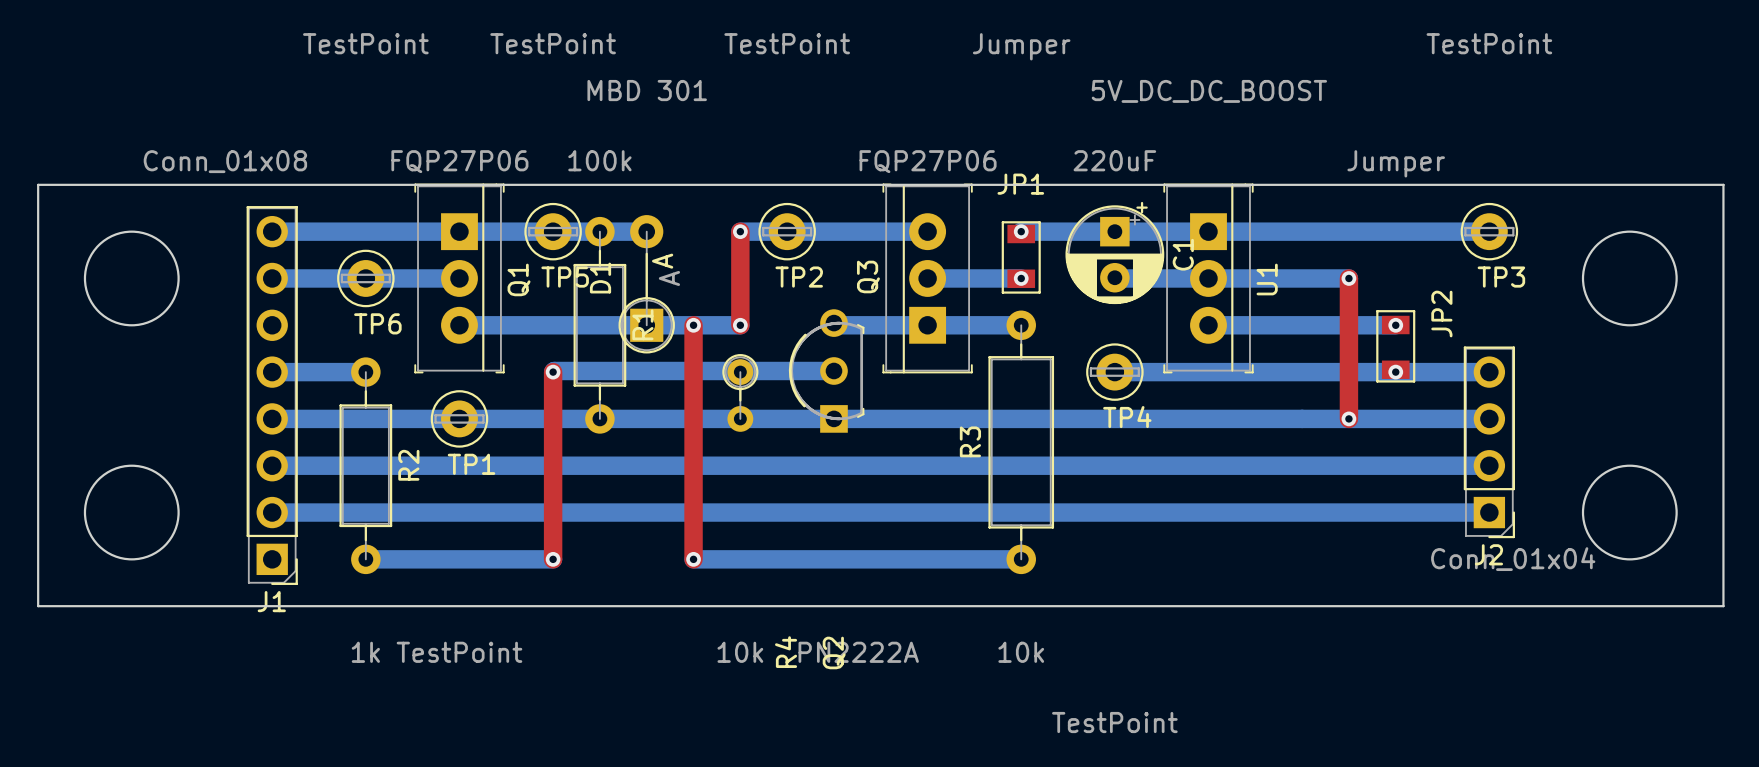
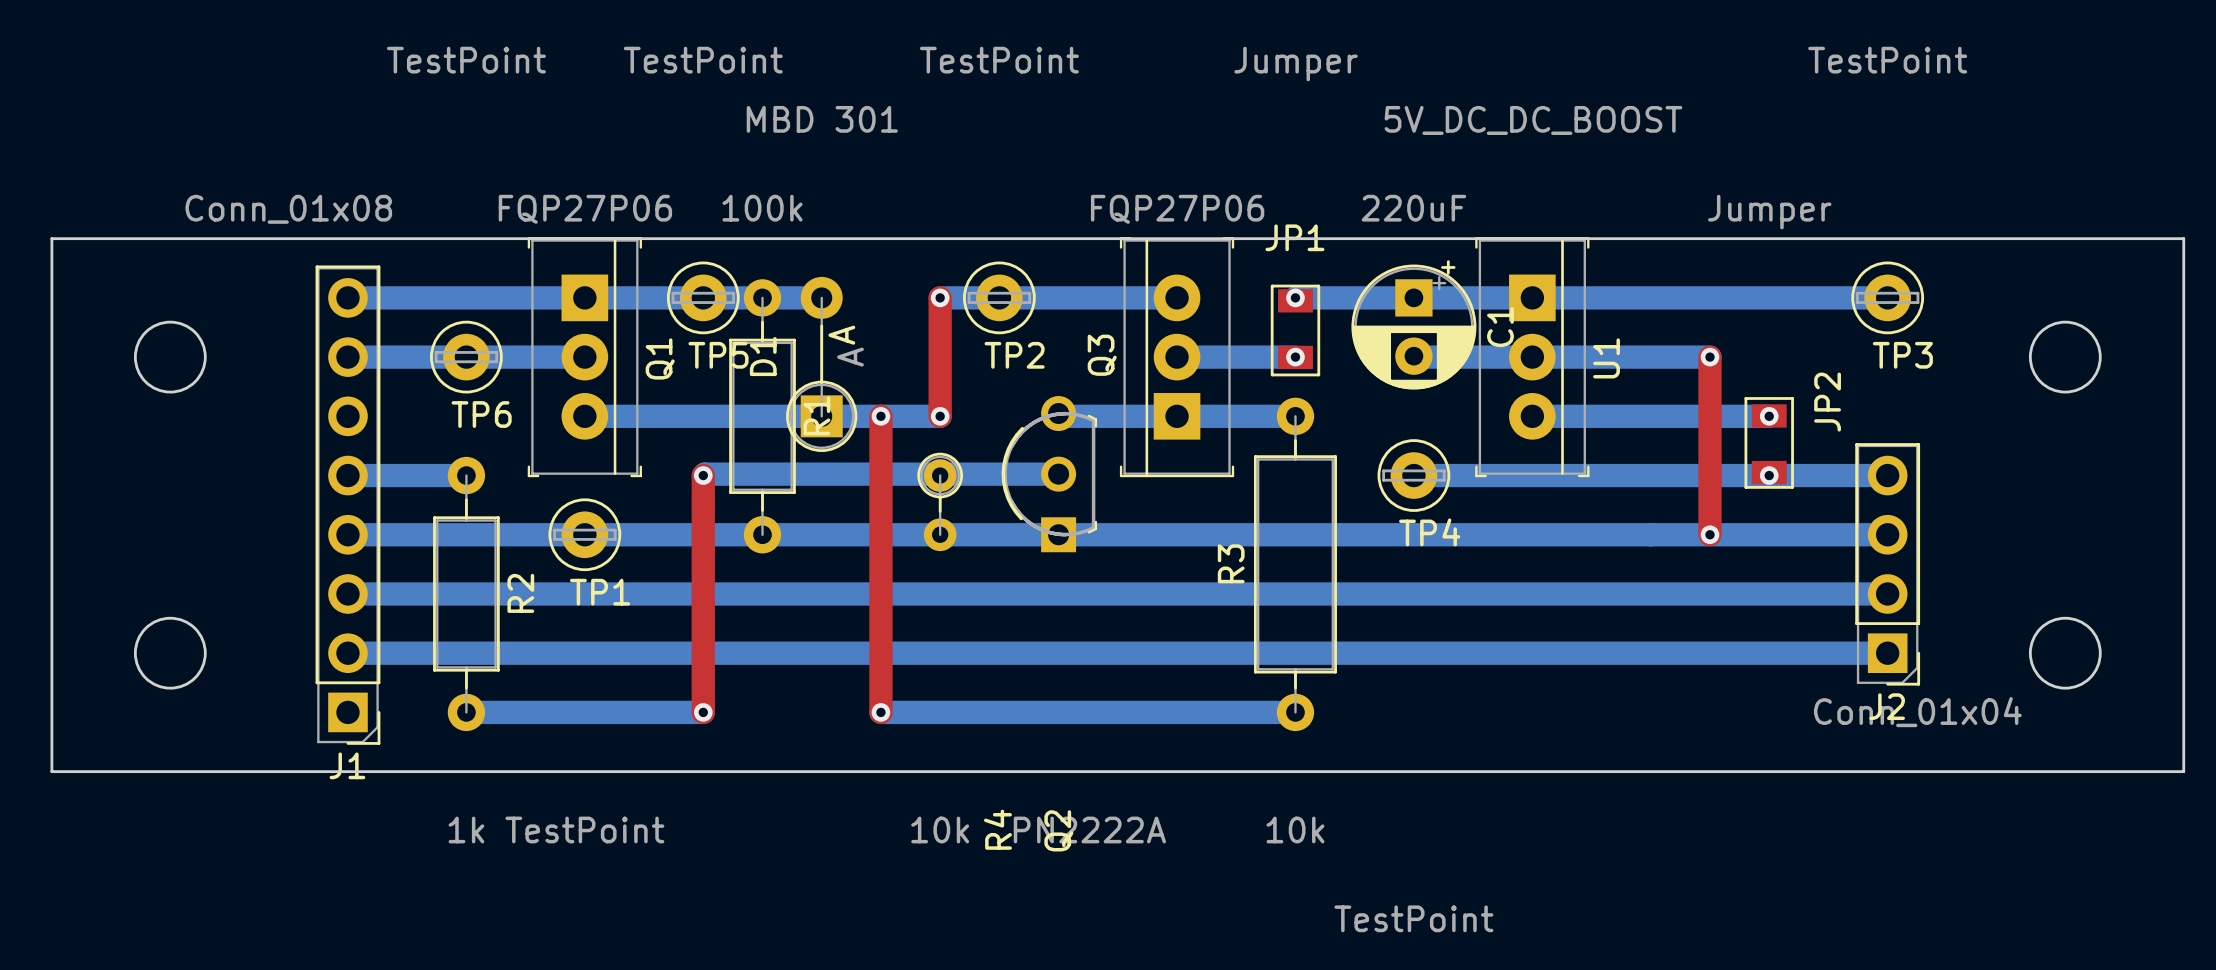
round board edge size: [83, 230, 180, 327] -> [133, 320, 207, 394]
round board edge size: [1581, 230, 1678, 327] -> [2028, 320, 2102, 394]
round board edge size: [83, 464, 180, 561] -> [133, 616, 207, 690]
round board edge size: [1581, 464, 1678, 561] -> [2028, 616, 2102, 690]

